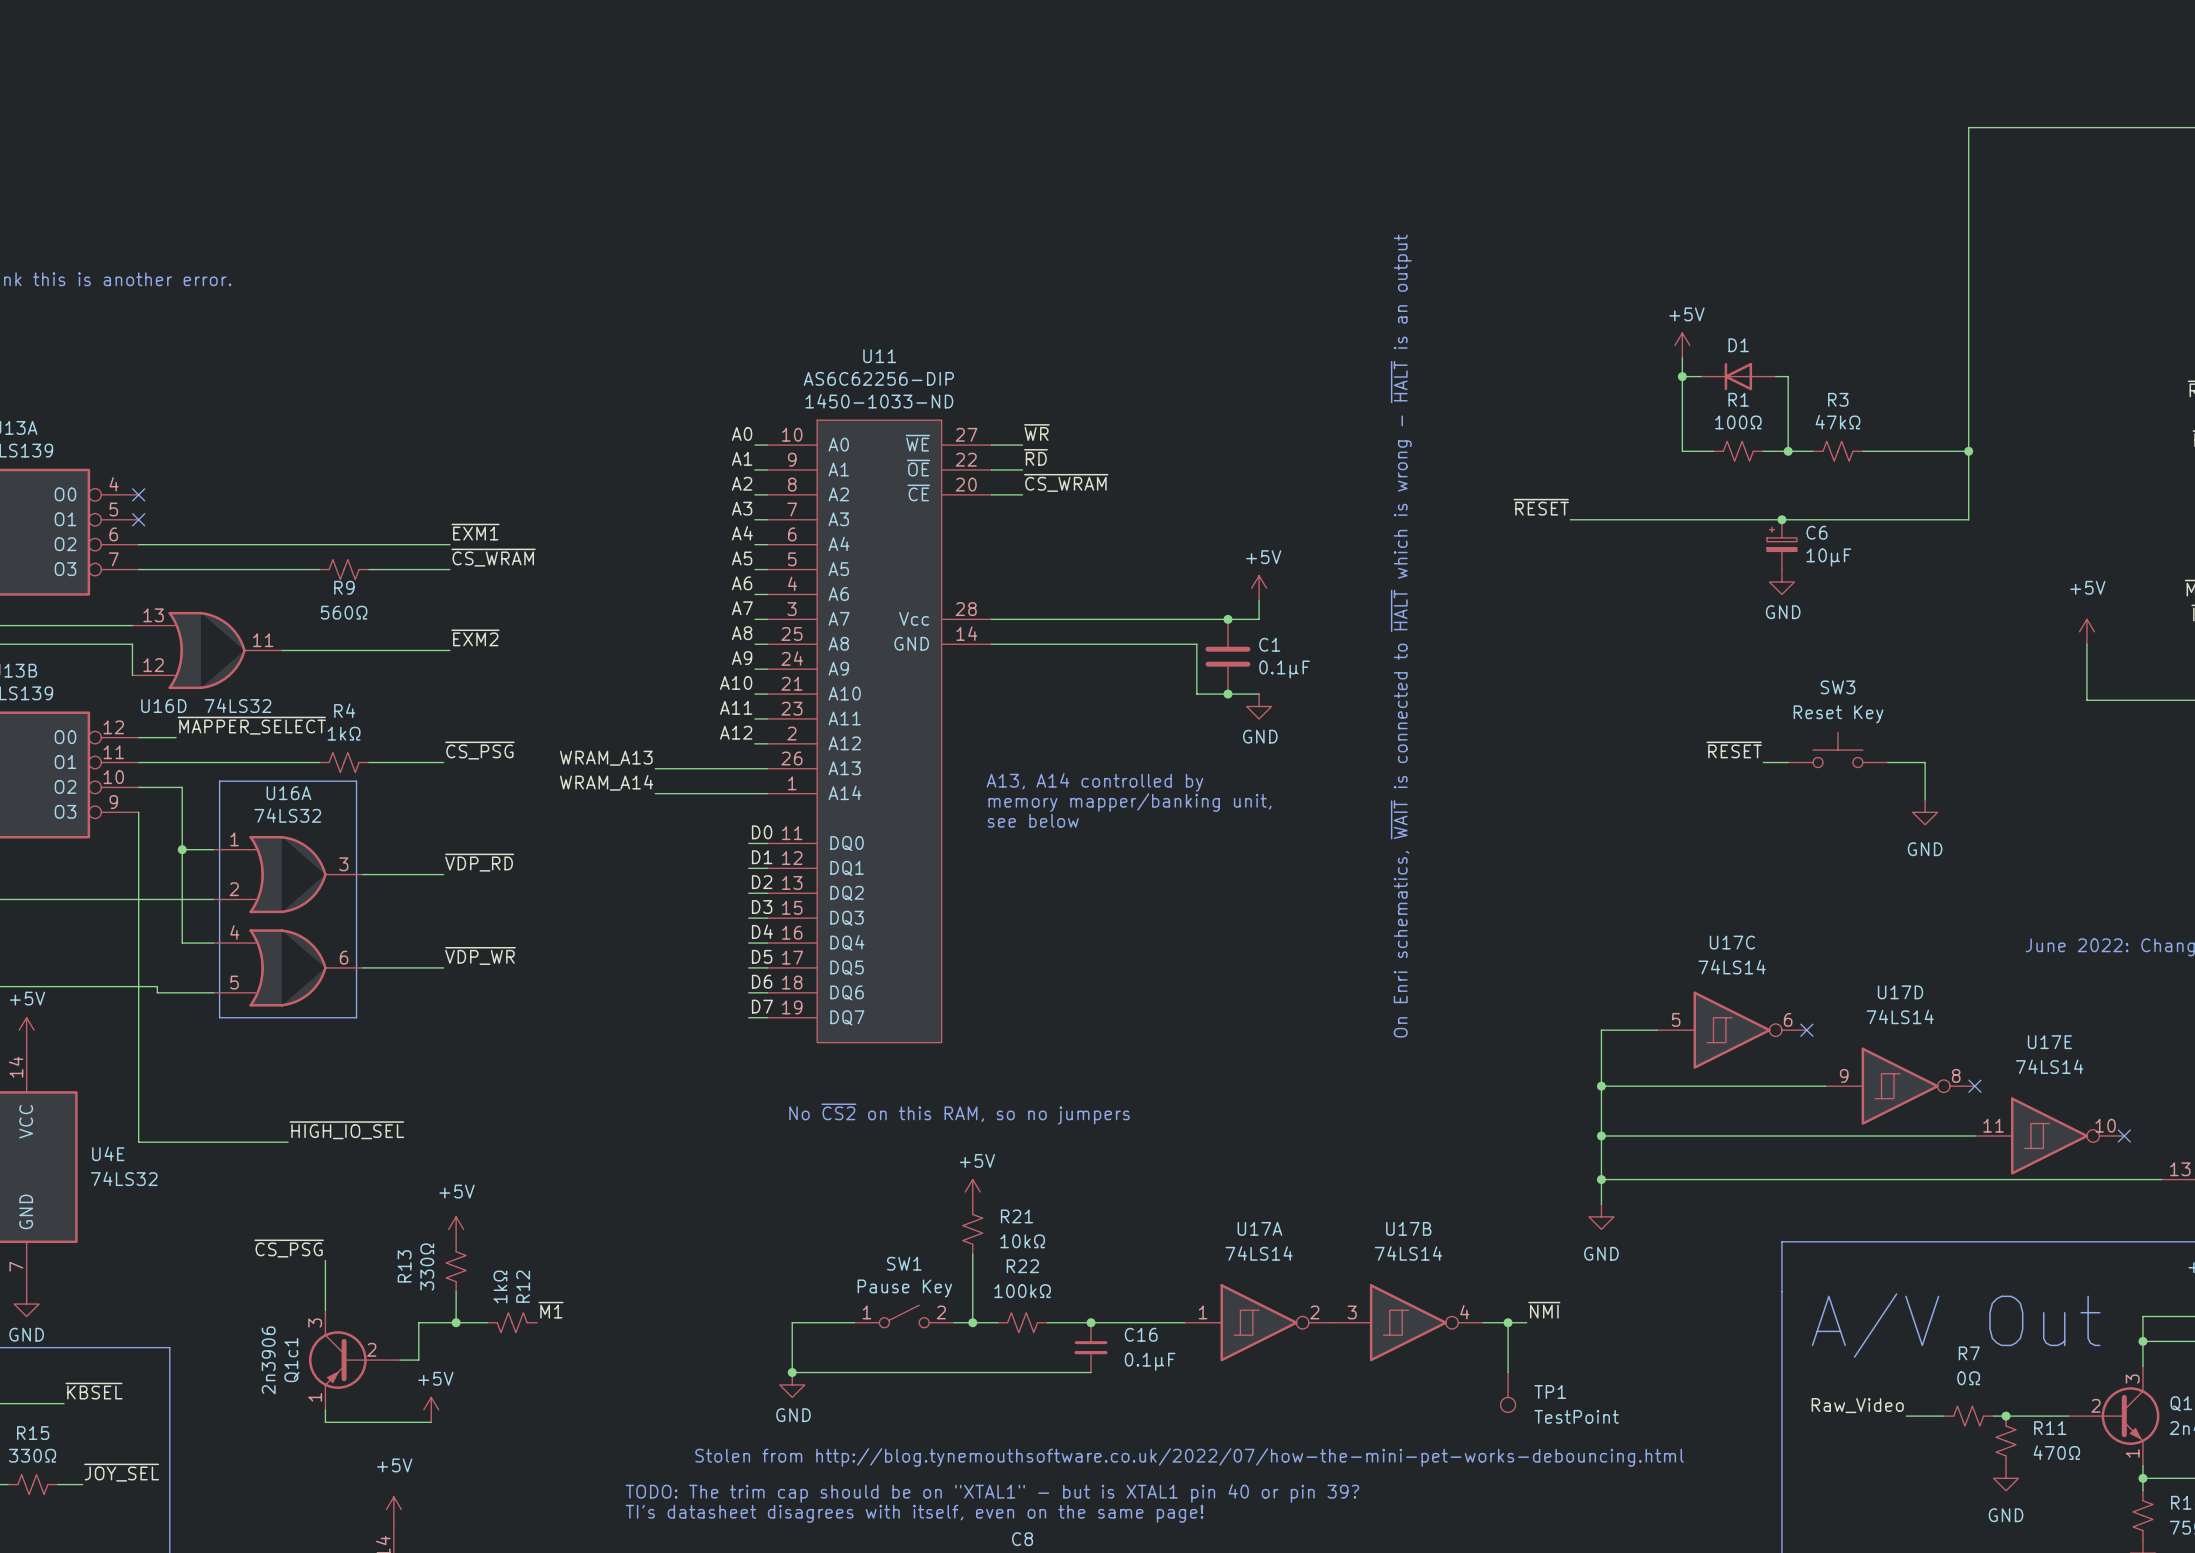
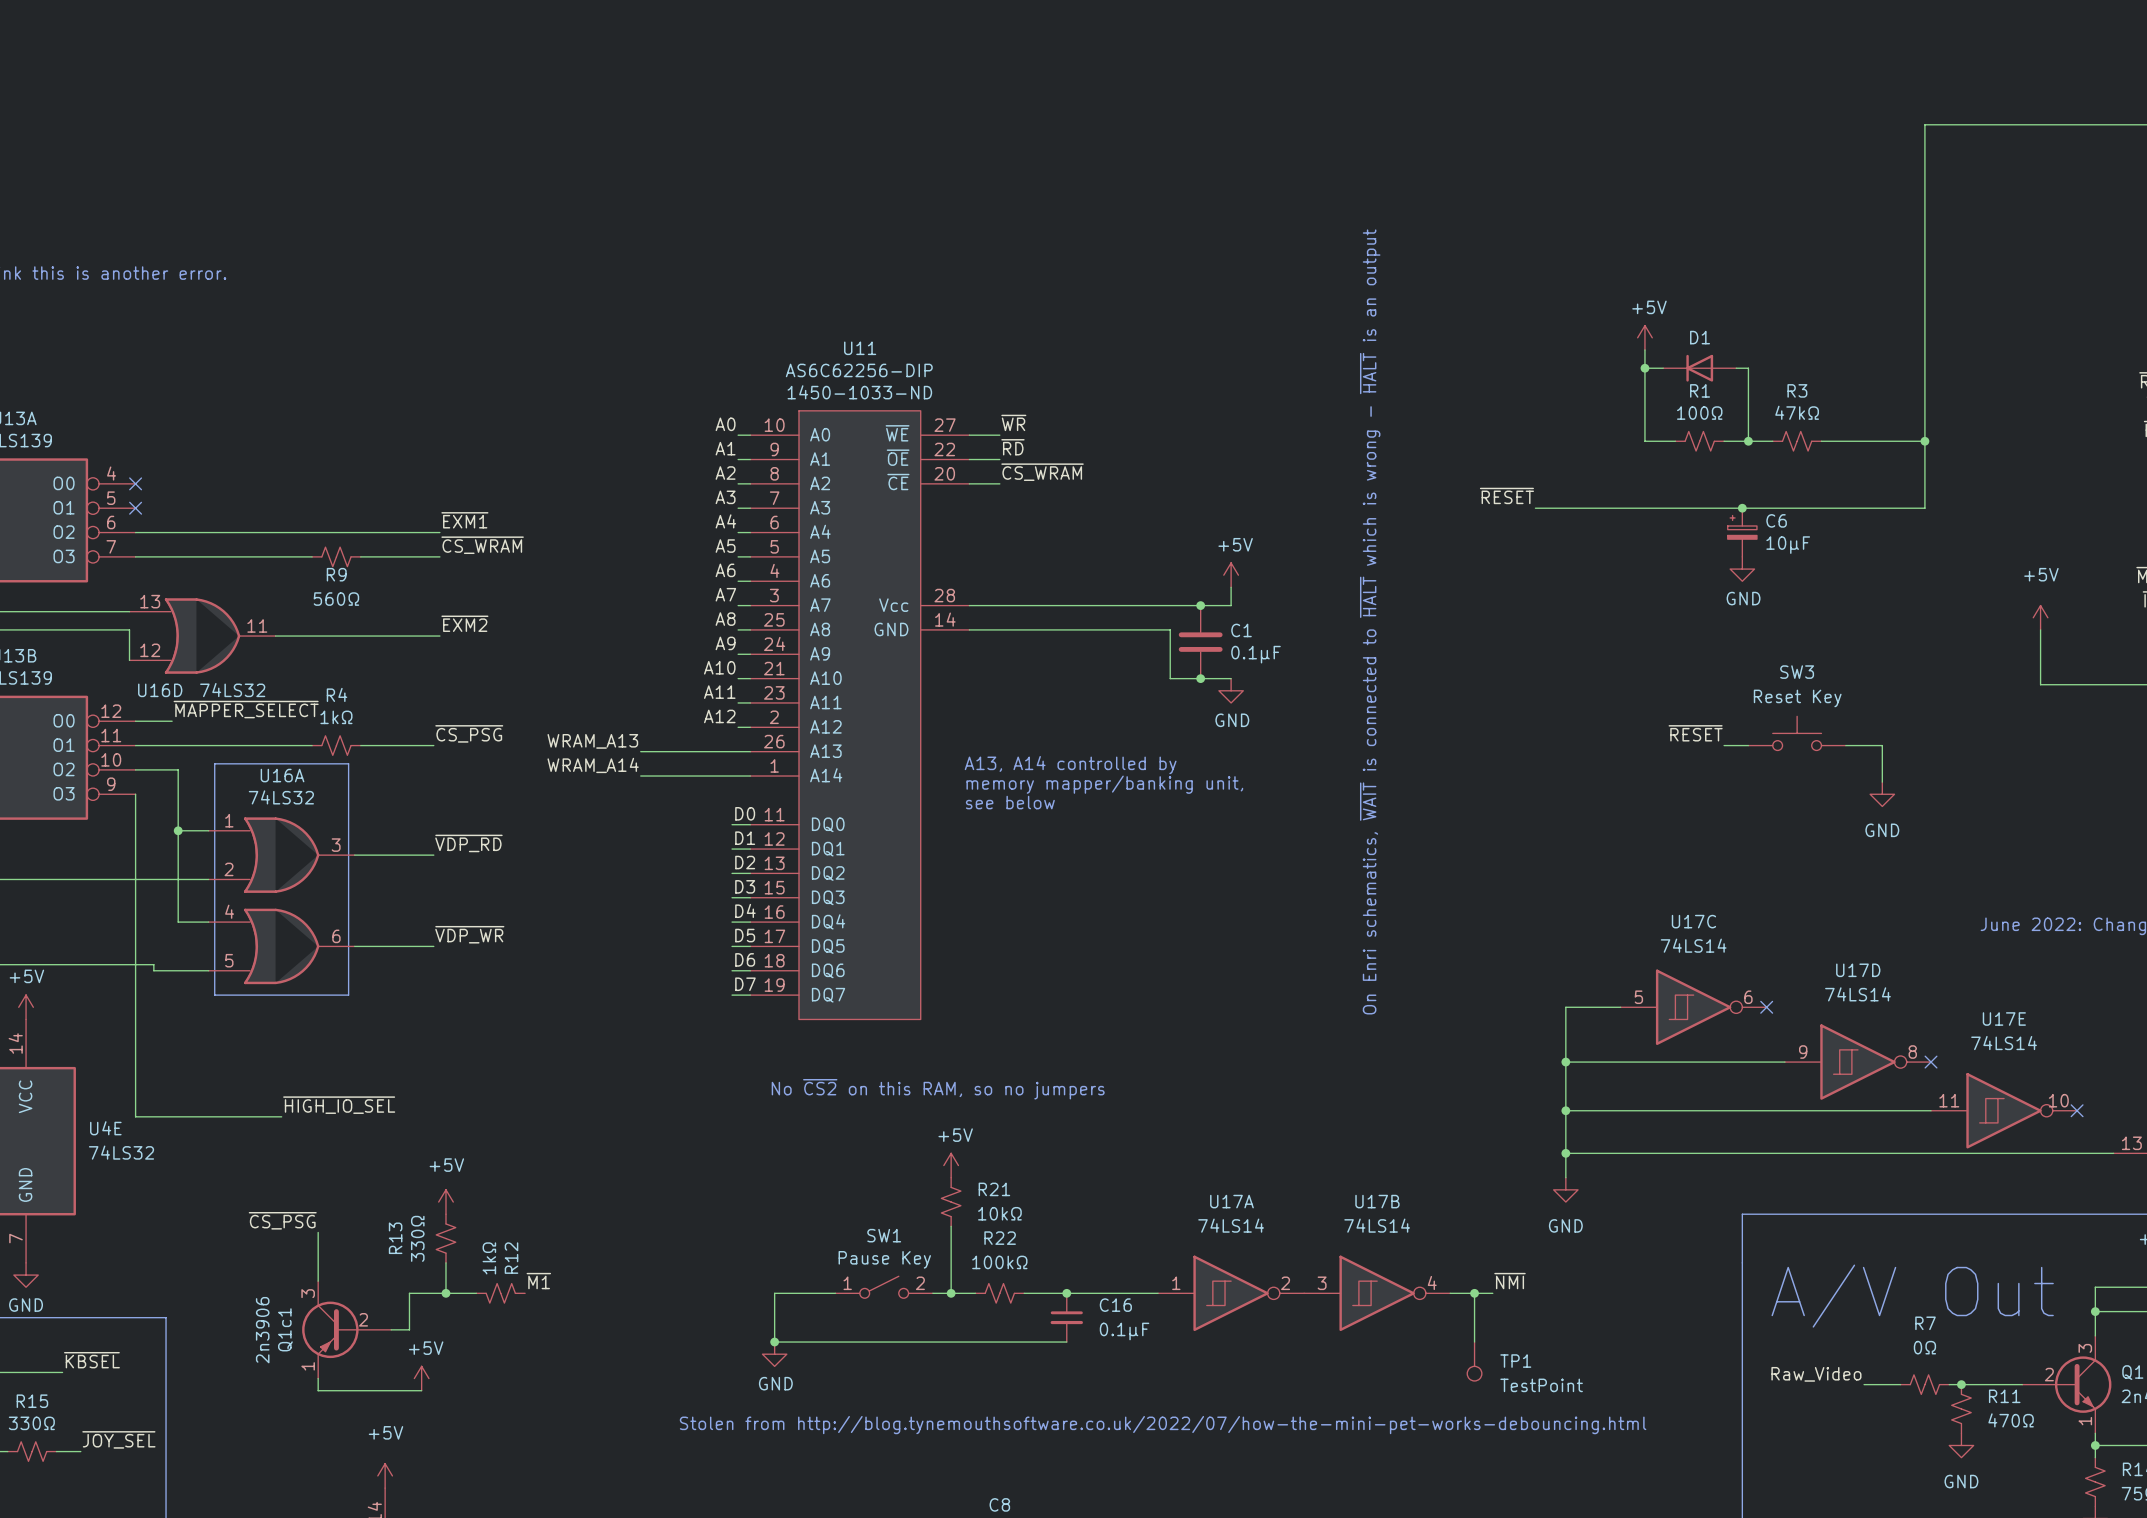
text: TODO: The trim cap should be on "XTAL1" - but is XTAL1 pin 40 or pin 39? (992, 1493) -> none
text: TI's datasheet disagrees with itself, even on the same page! (914, 1513) -> none

